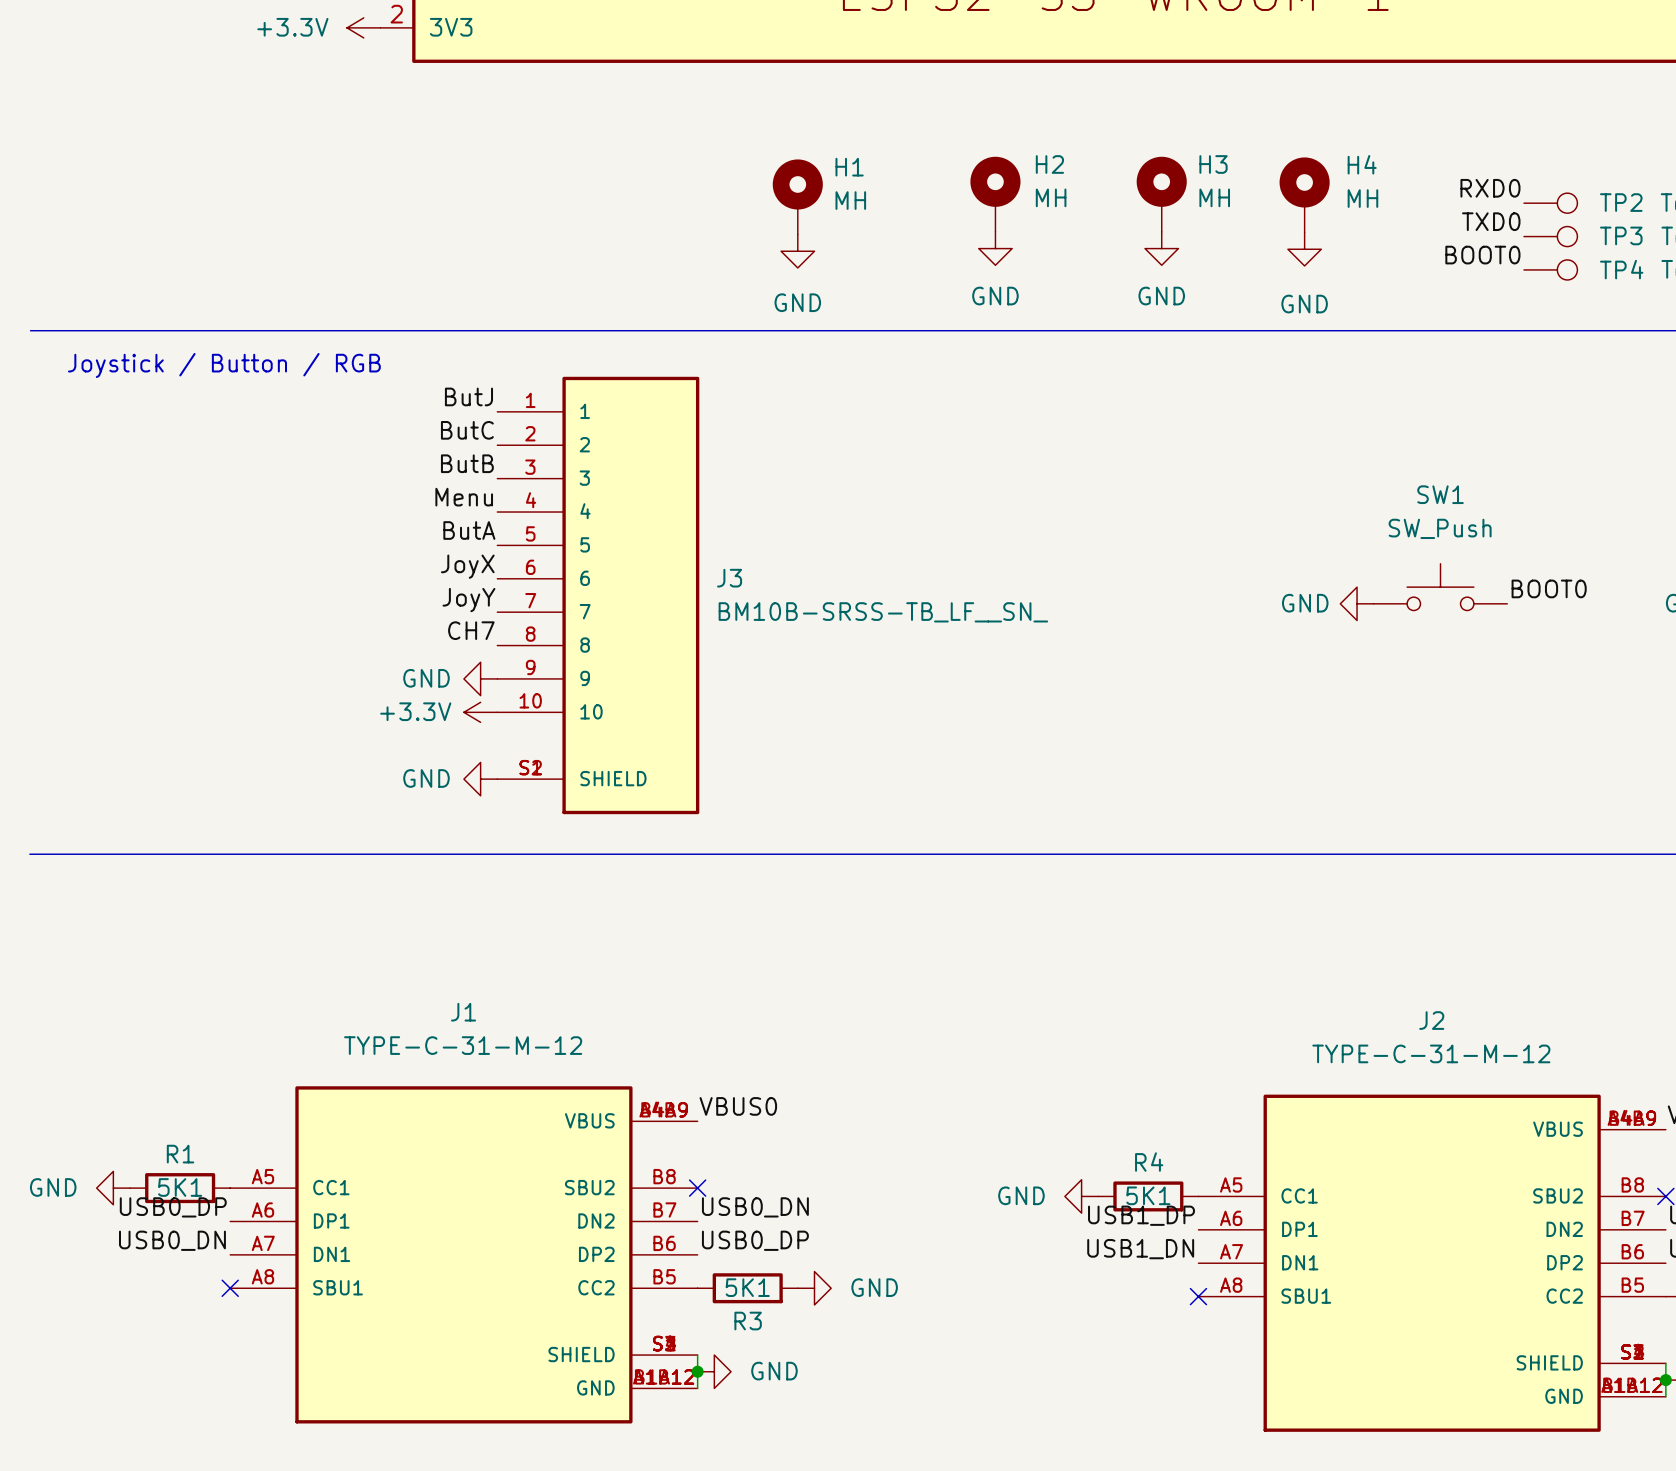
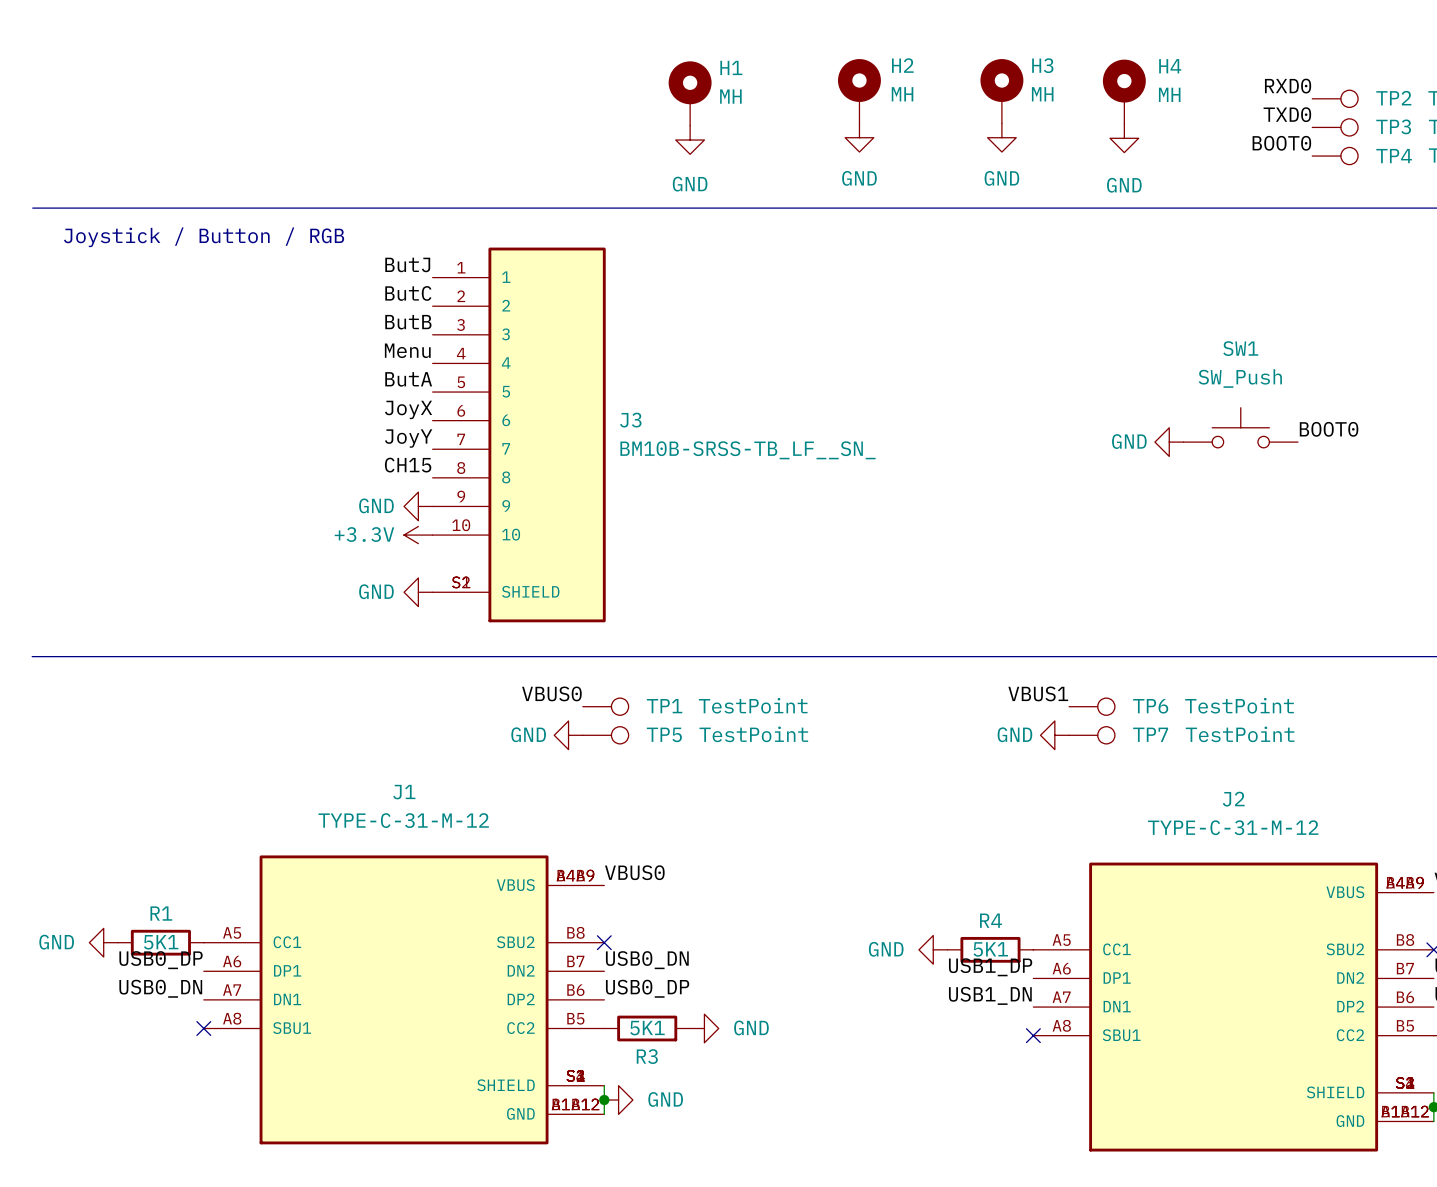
label: CH7 (471, 630) -> CH15 (408, 465)
label: none -> VBUS0 (551, 693)
label: none -> VBUS1 (1038, 693)
TP1: none -> TestPoint (605, 706)
TP6: none -> TestPoint (1092, 706)
power symbol: none -> GND (568, 735)
TP5: none -> TestPoint (605, 735)
power symbol: none -> GND (1054, 735)
TP7: none -> TestPoint (1092, 735)

